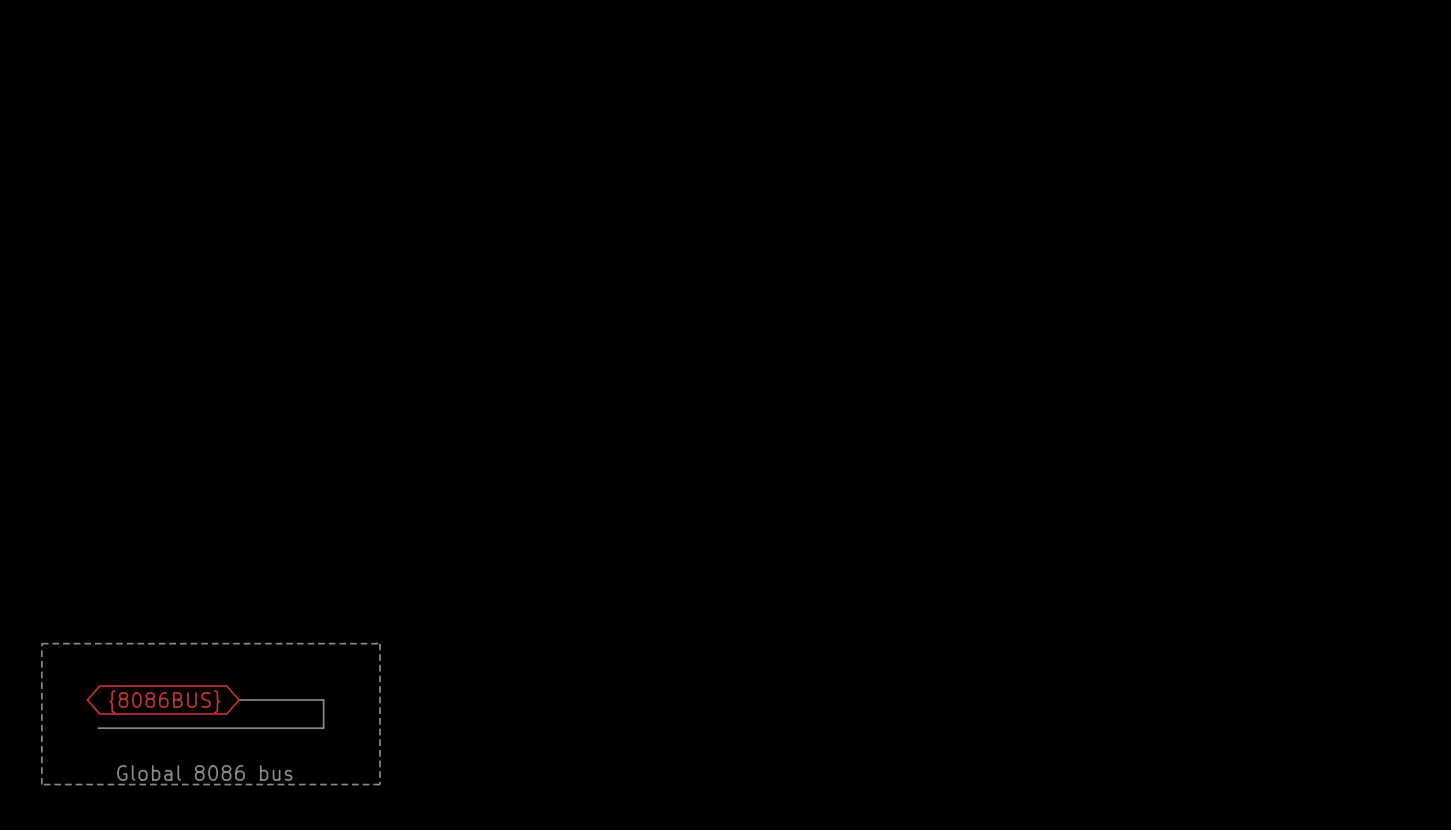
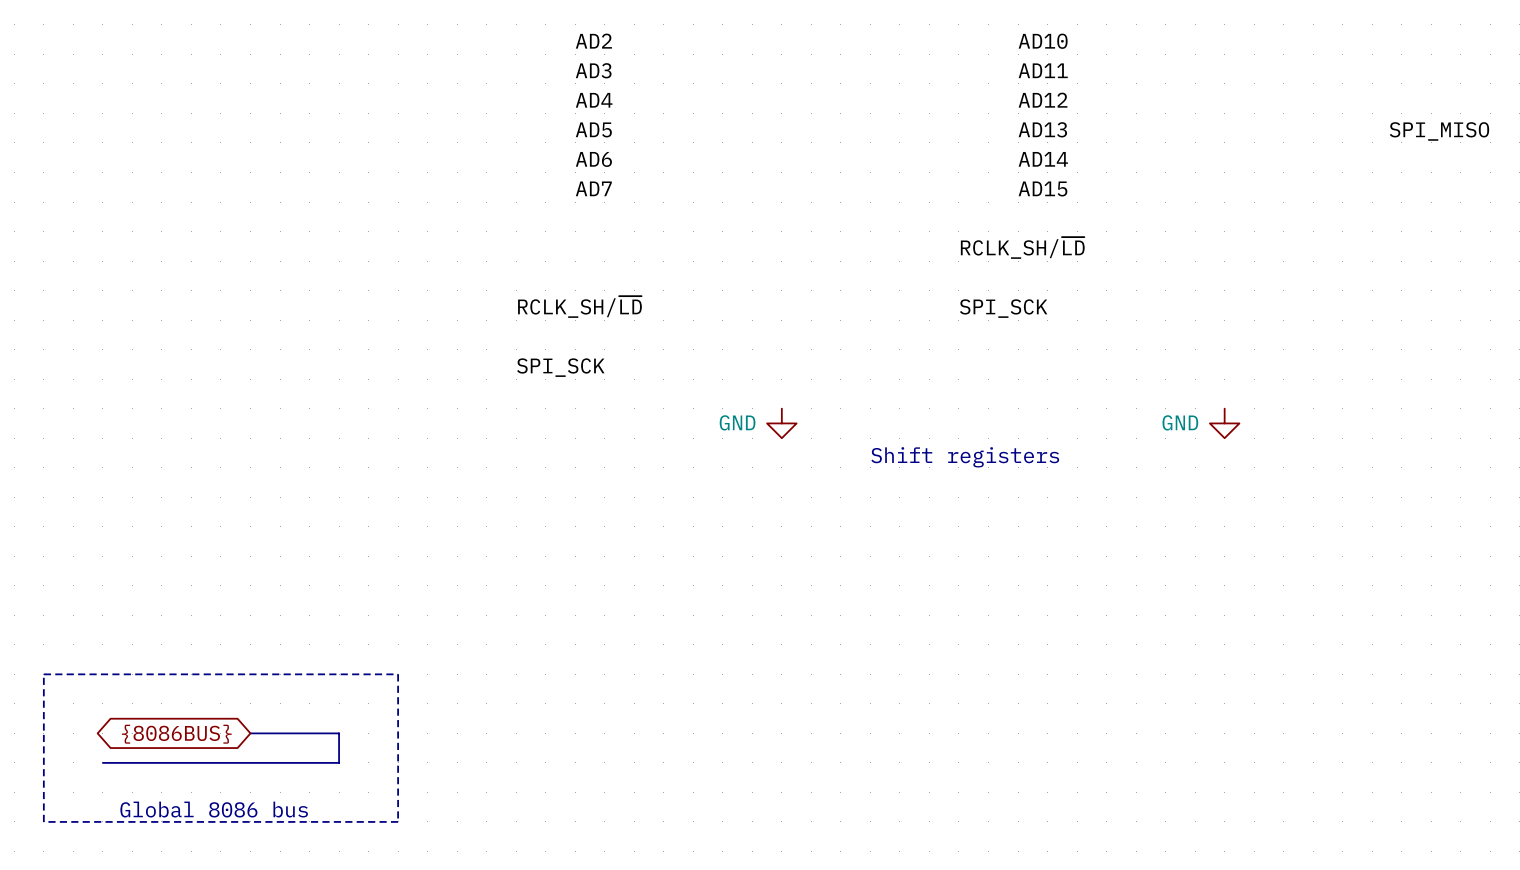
label: none -> AD2 (593, 41)
label: none -> AD10 (1043, 41)
label: none -> AD3 (593, 70)
label: none -> AD11 (1043, 70)
label: none -> AD4 (594, 100)
label: none -> AD12 (1043, 100)
label: none -> AD5 (593, 129)
label: none -> AD13 (1042, 129)
label: none -> SPI_MISO (1439, 131)
label: none -> AD14 (1043, 159)
label: none -> AD6 (593, 159)
label: none -> AD7 (593, 188)
label: none -> AD15 (1043, 188)
label: none -> RCLK_SH/~{LD} (1022, 247)
label: none -> RCLK_SH/~{LD} (579, 307)
label: none -> SPI_SCK (1003, 308)
label: none -> SPI_SCK (560, 367)
power symbol: none -> GND (781, 423)
power symbol: none -> GND (1224, 423)
text: none -> Shift registers (965, 457)

